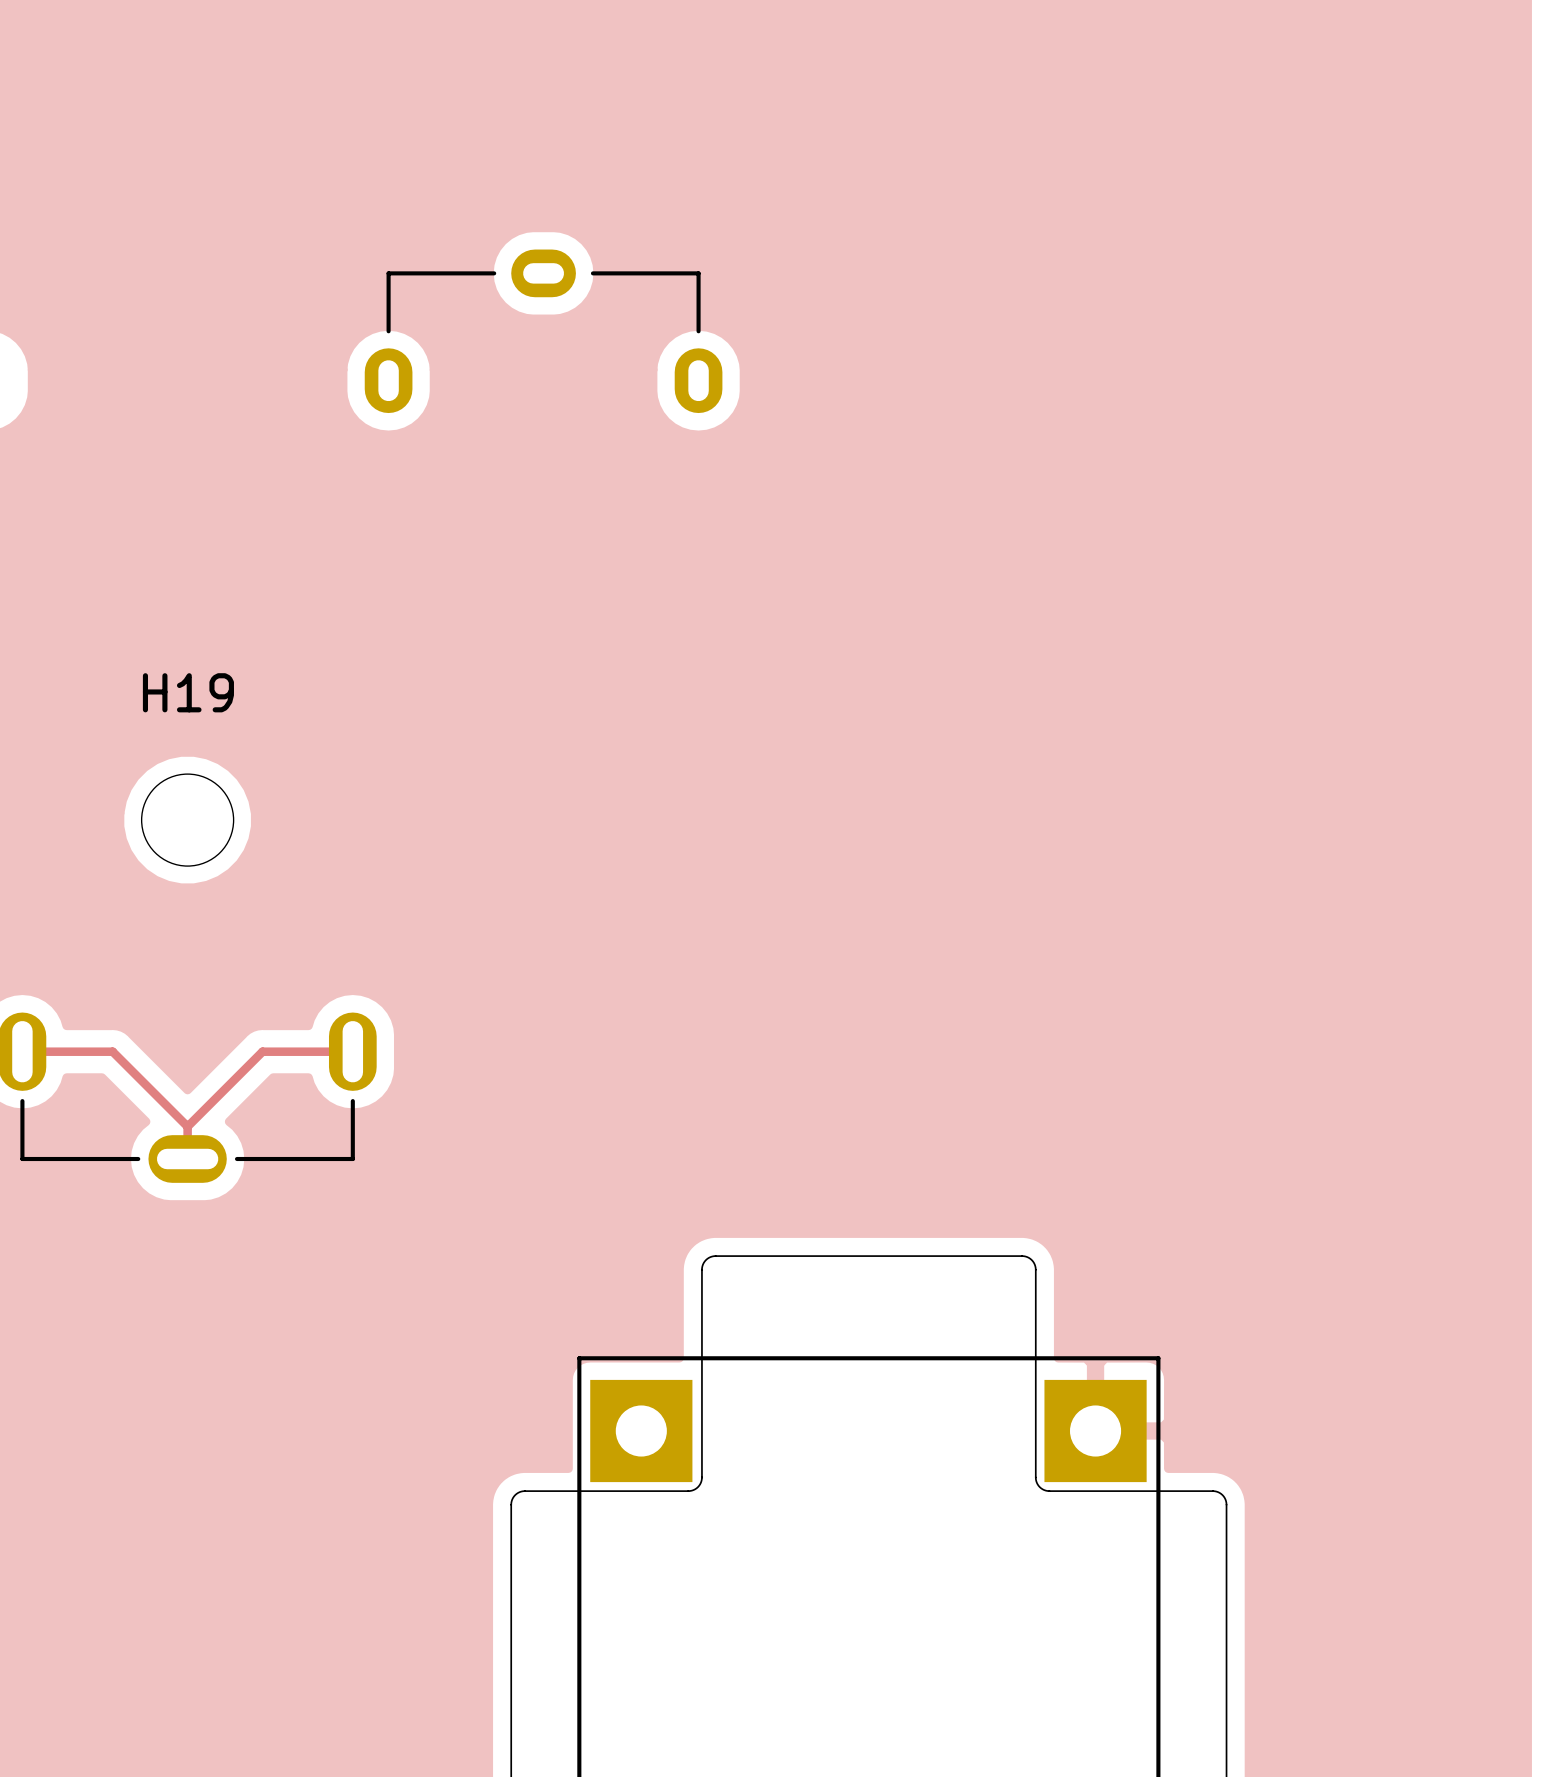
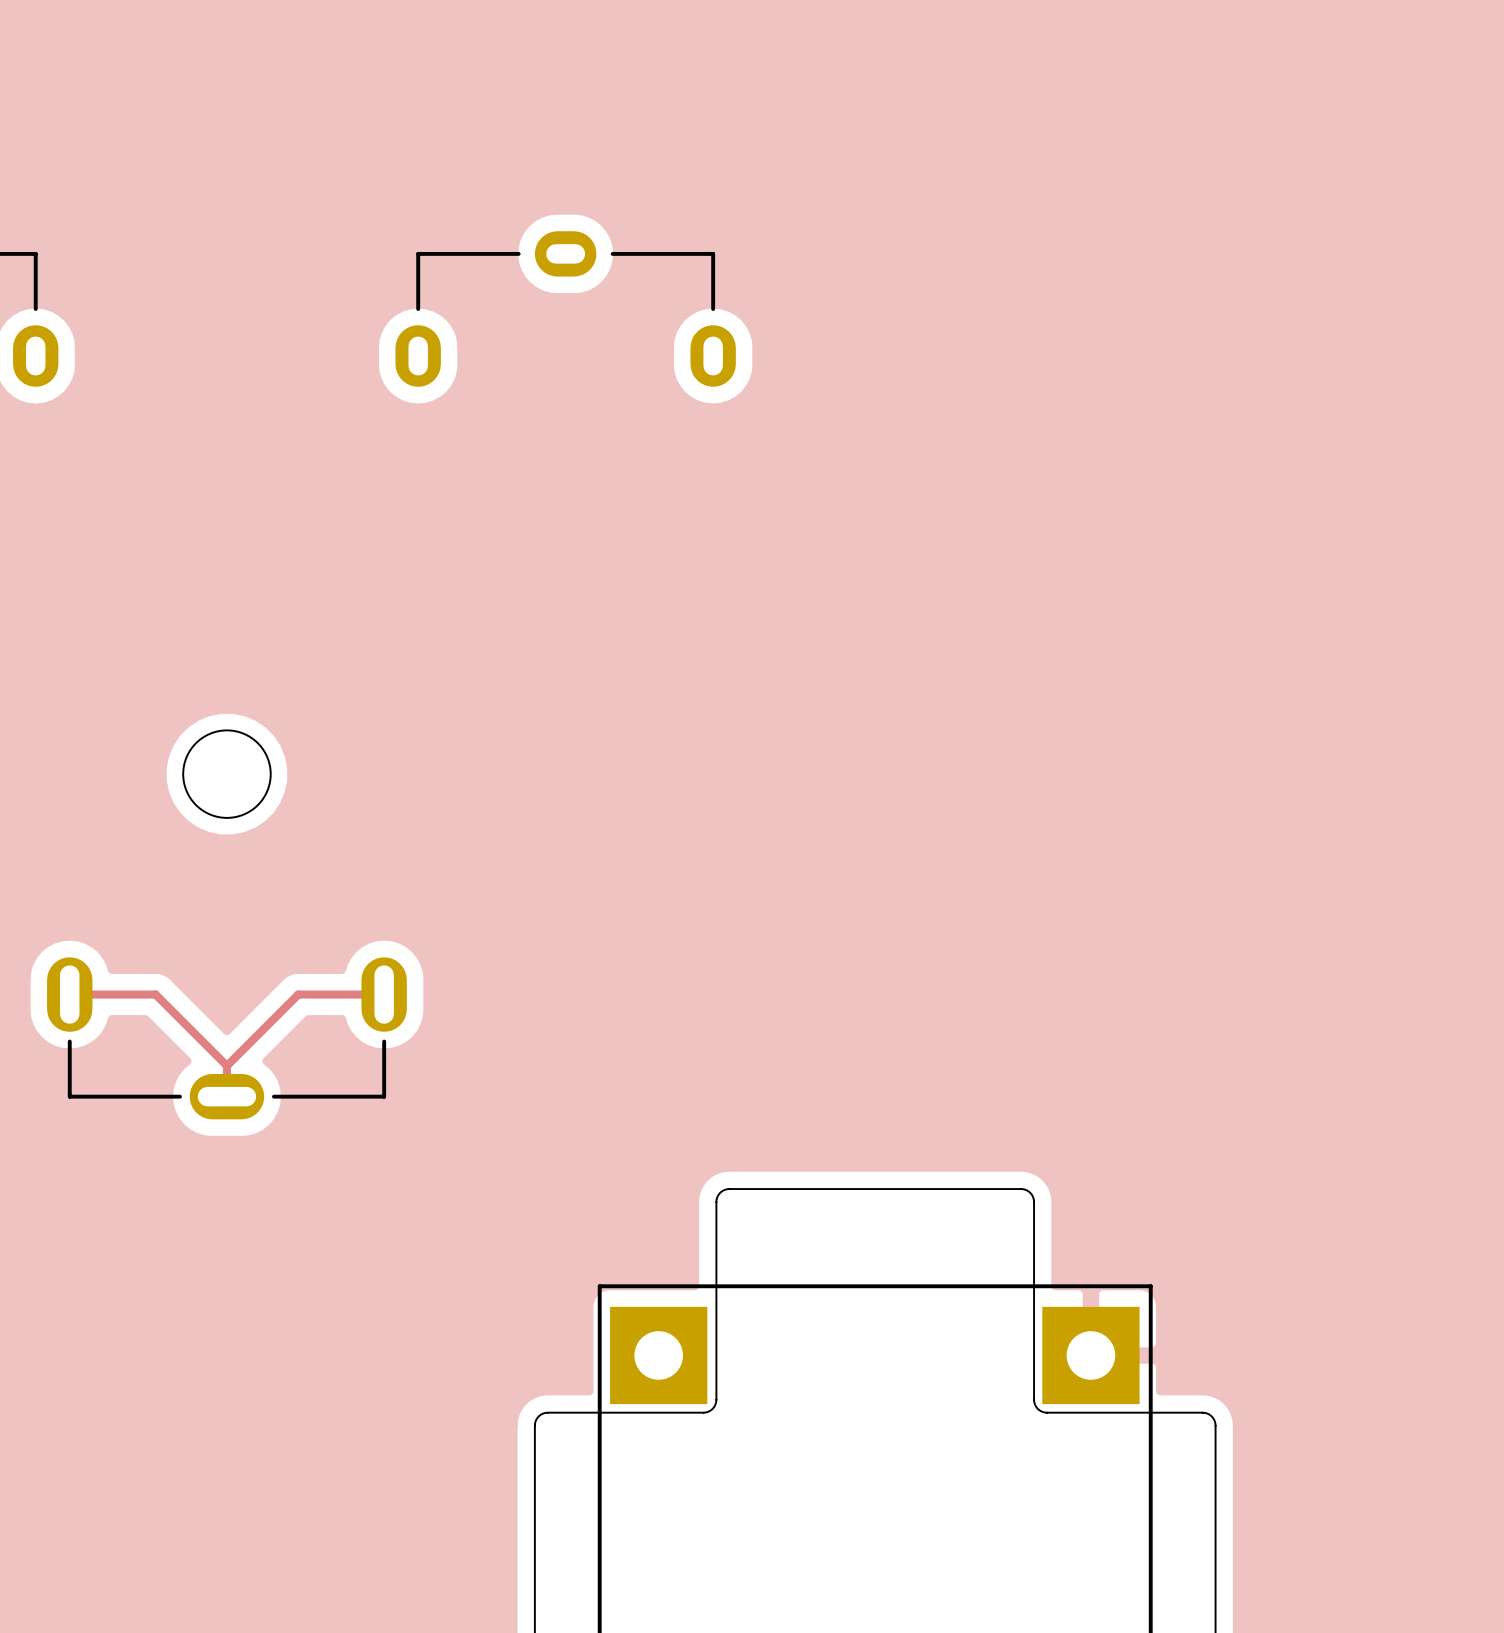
H19 name: H19 (188, 692) -> none

